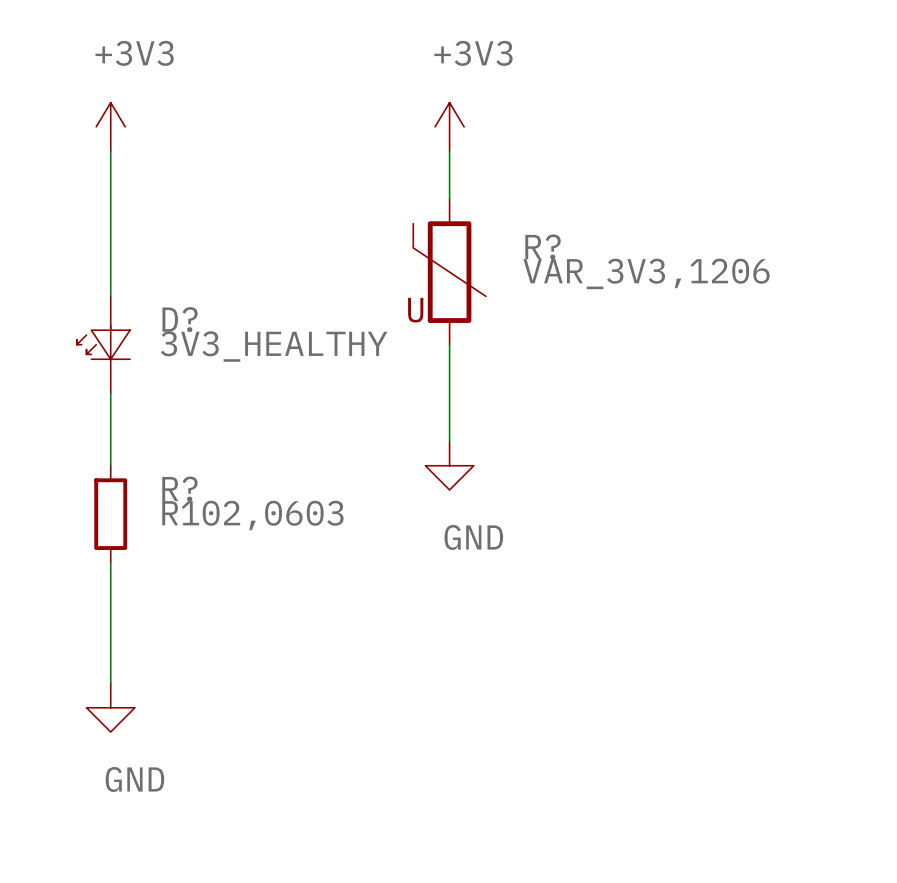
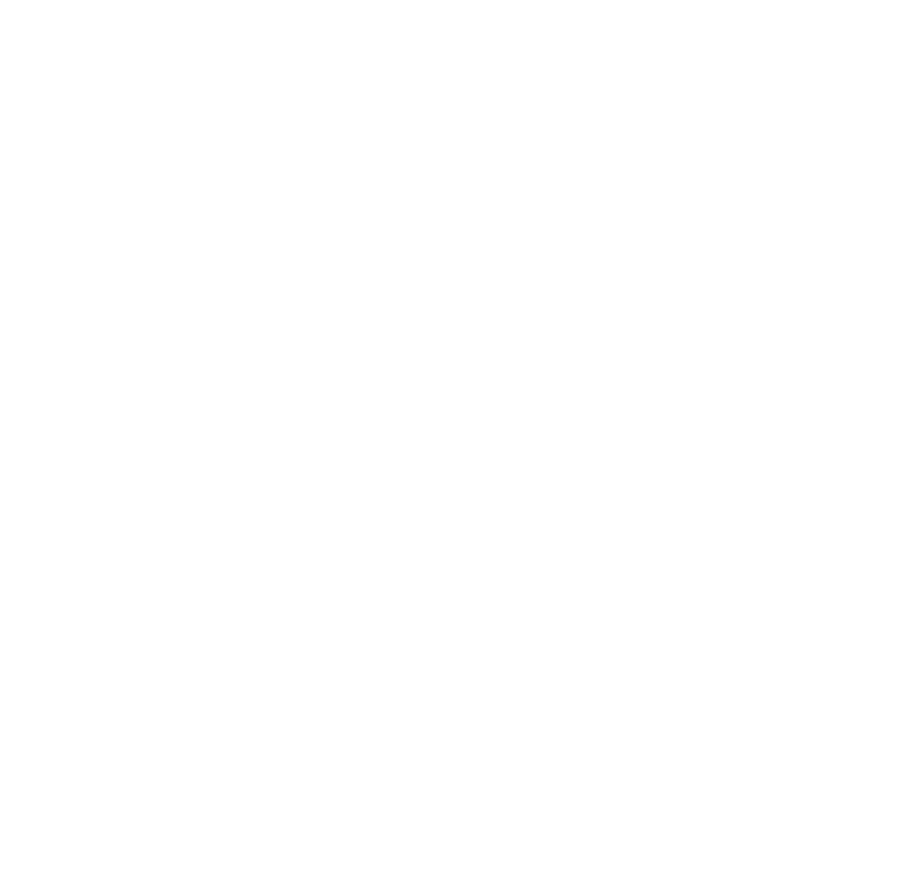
power symbol: +3V3 (110, 126) -> none
power symbol: +3V3 (449, 126) -> none
wire: (110, 151) (110, 296) -> none
wire: (449, 151) (449, 199) -> none
R?: VAR_3V3,1206 (449, 272) -> none
D?: 3V3_HEALTHY (103, 344) -> none
wire: (449, 344) (449, 441) -> none
wire: (110, 393) (110, 465) -> none
power symbol: GND (449, 465) -> none
R?: R102,0603 (110, 514) -> none
wire: (110, 562) (110, 683) -> none
power symbol: GND (110, 707) -> none

